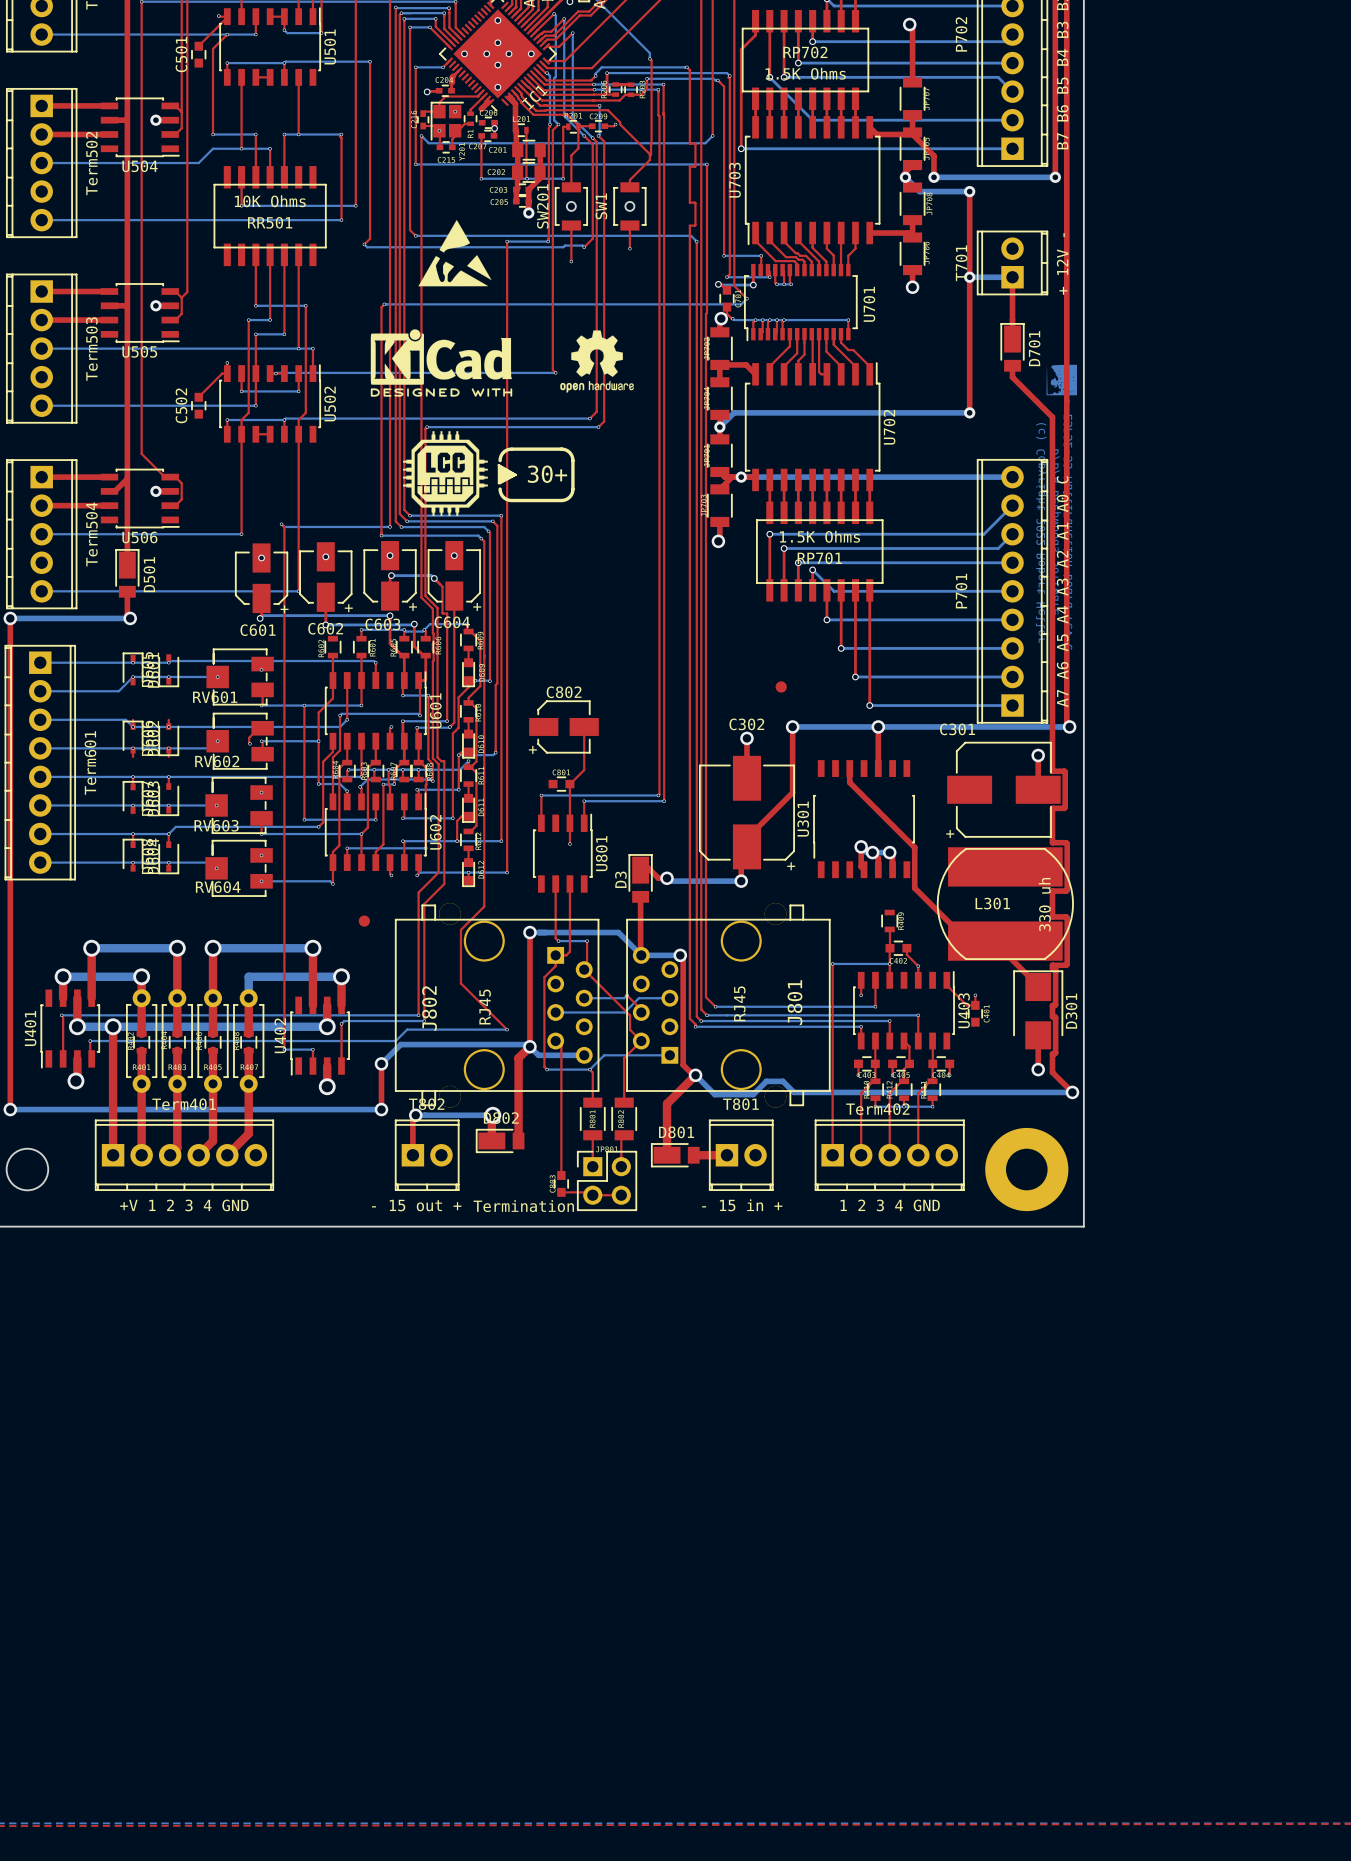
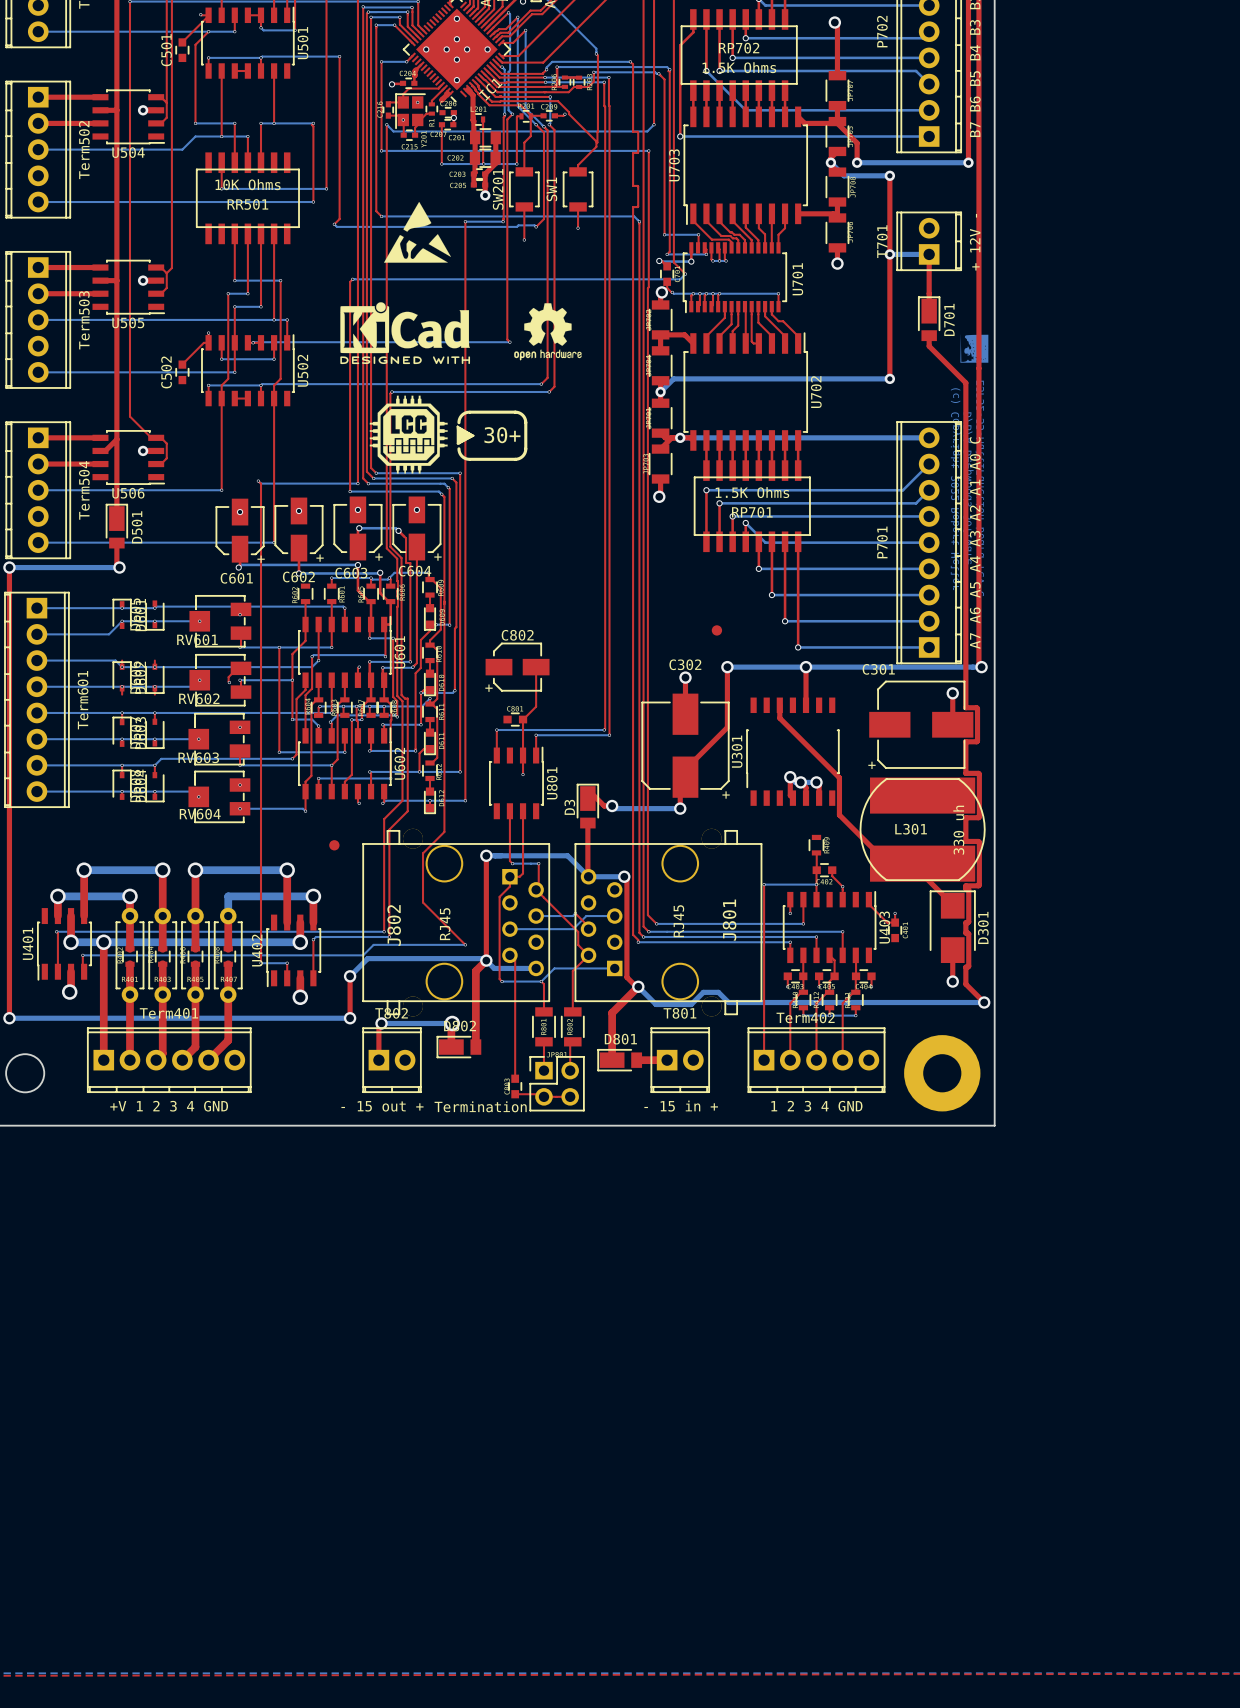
SW201 footprint: [554, 182, 588, 231] -> [509, 167, 540, 212]
SW1 footprint: [613, 182, 647, 231] -> [562, 167, 594, 212]

